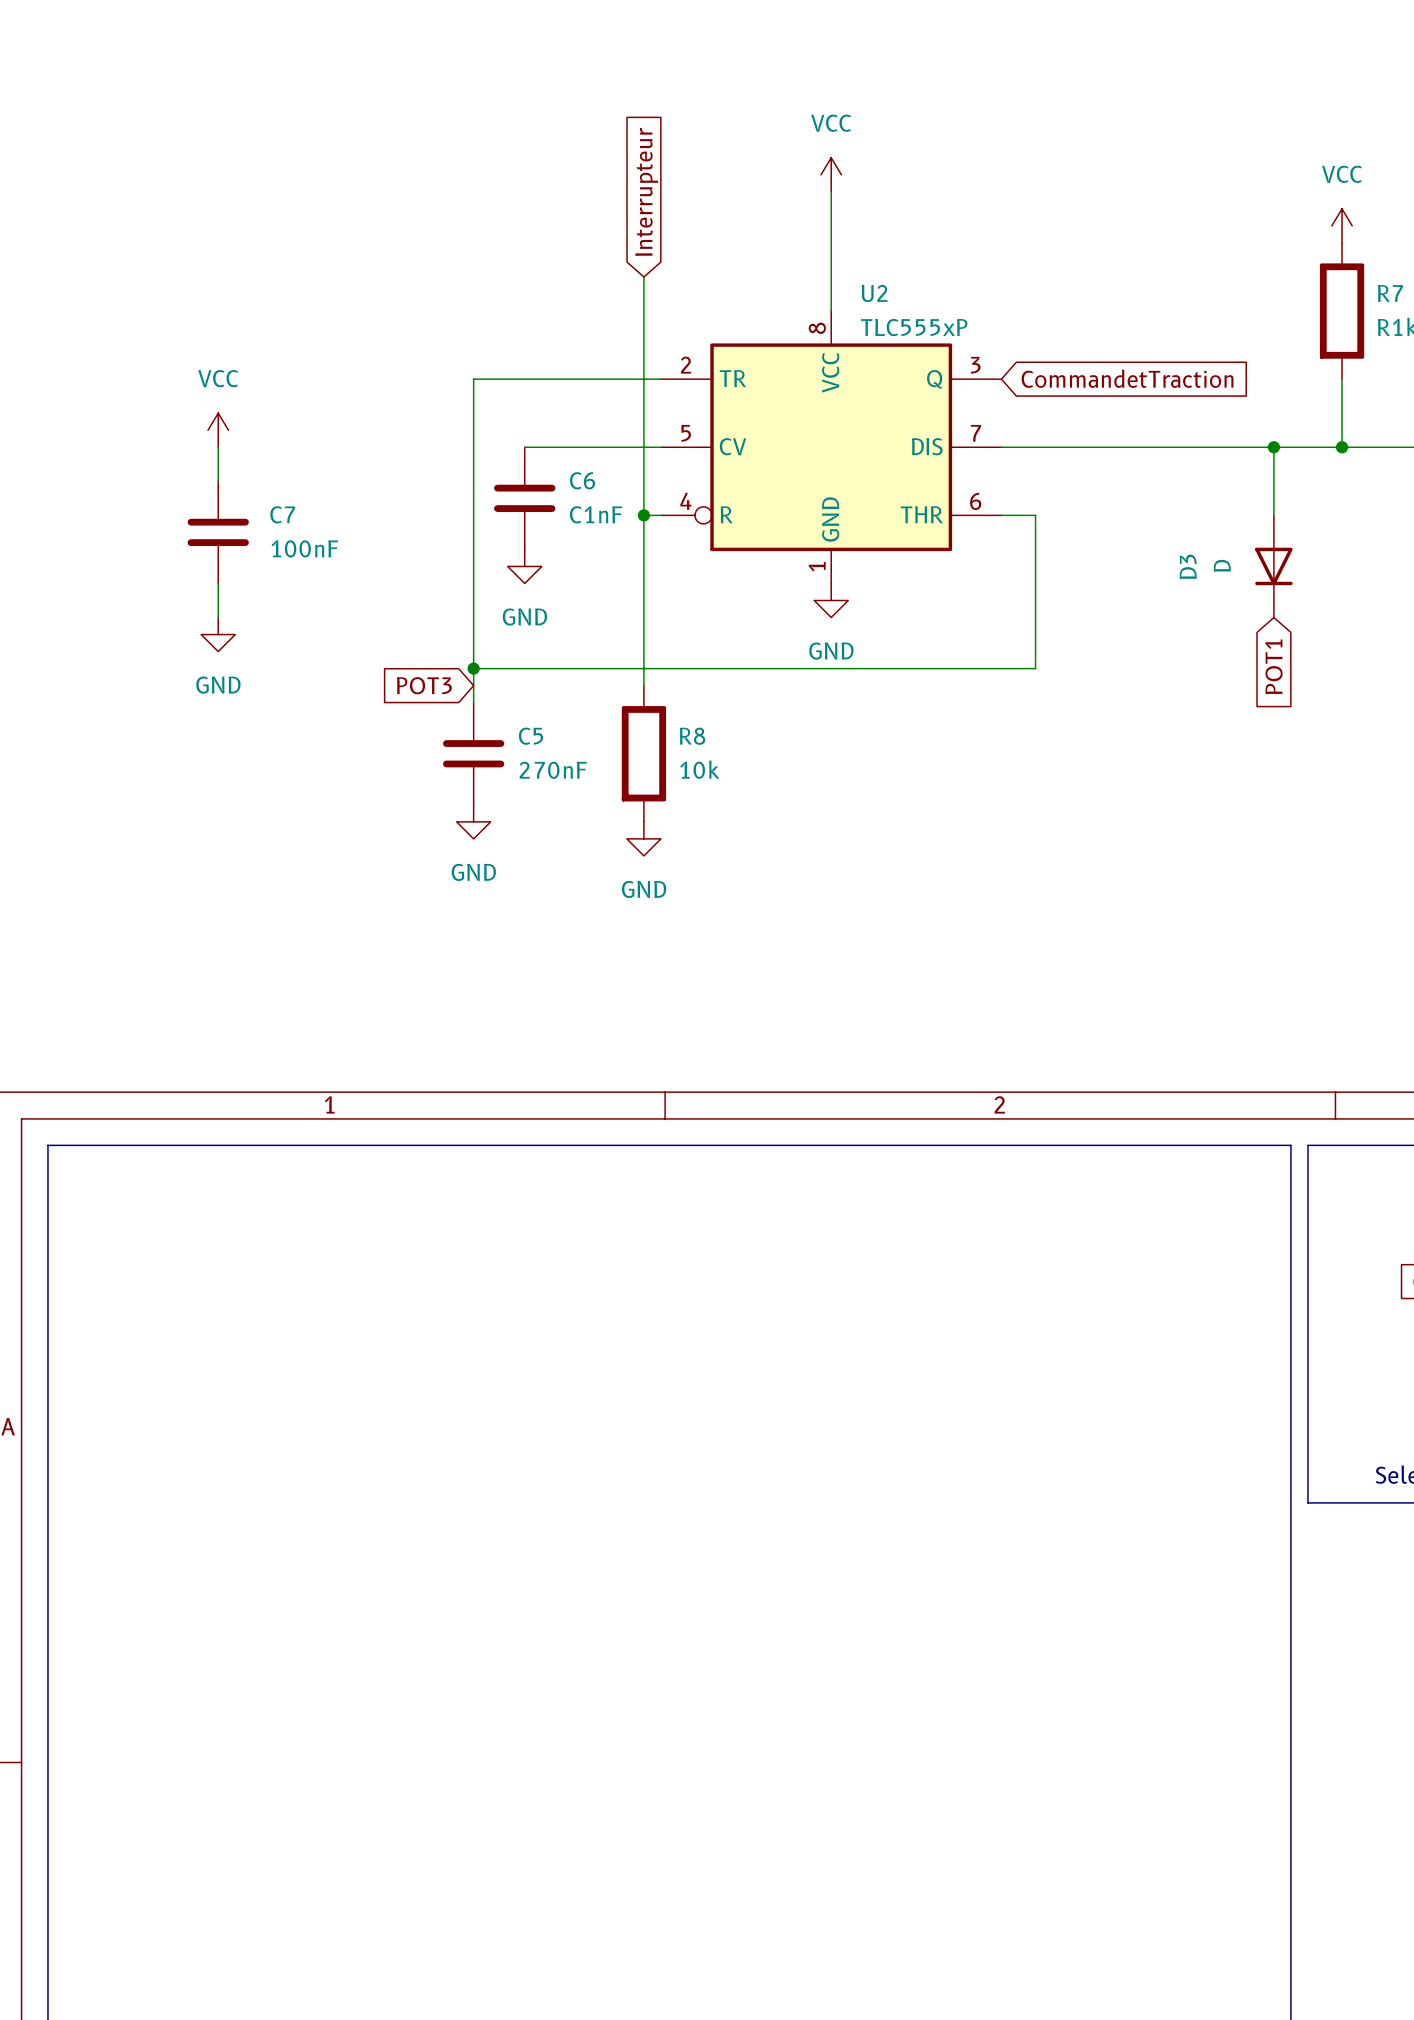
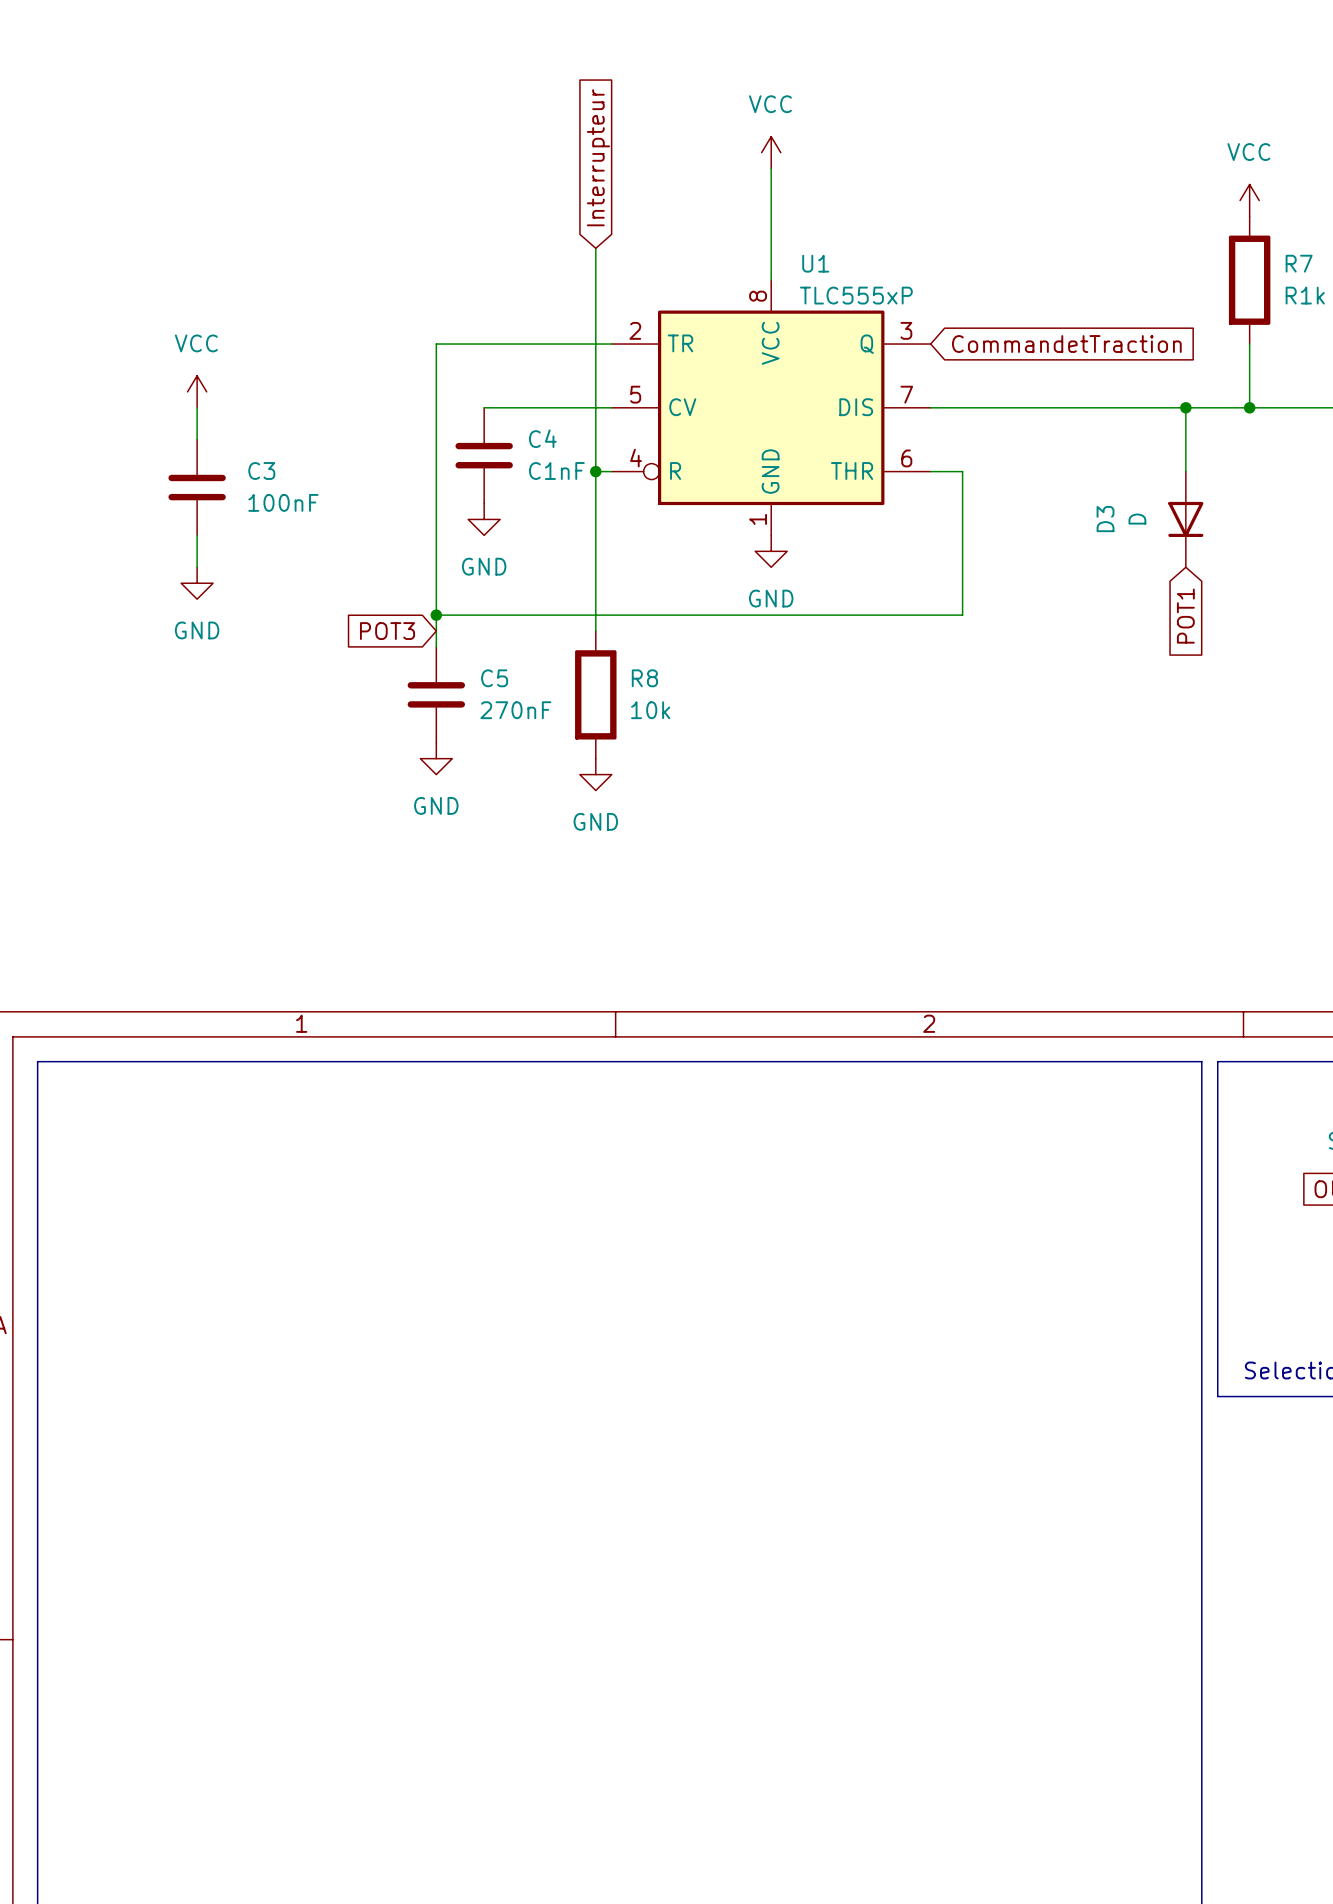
U2 name: U2 (874, 293) -> U1 (815, 263)
C6 name: C6 (582, 480) -> C4 (542, 438)
C7 name: C7 (282, 514) -> C3 (261, 471)

